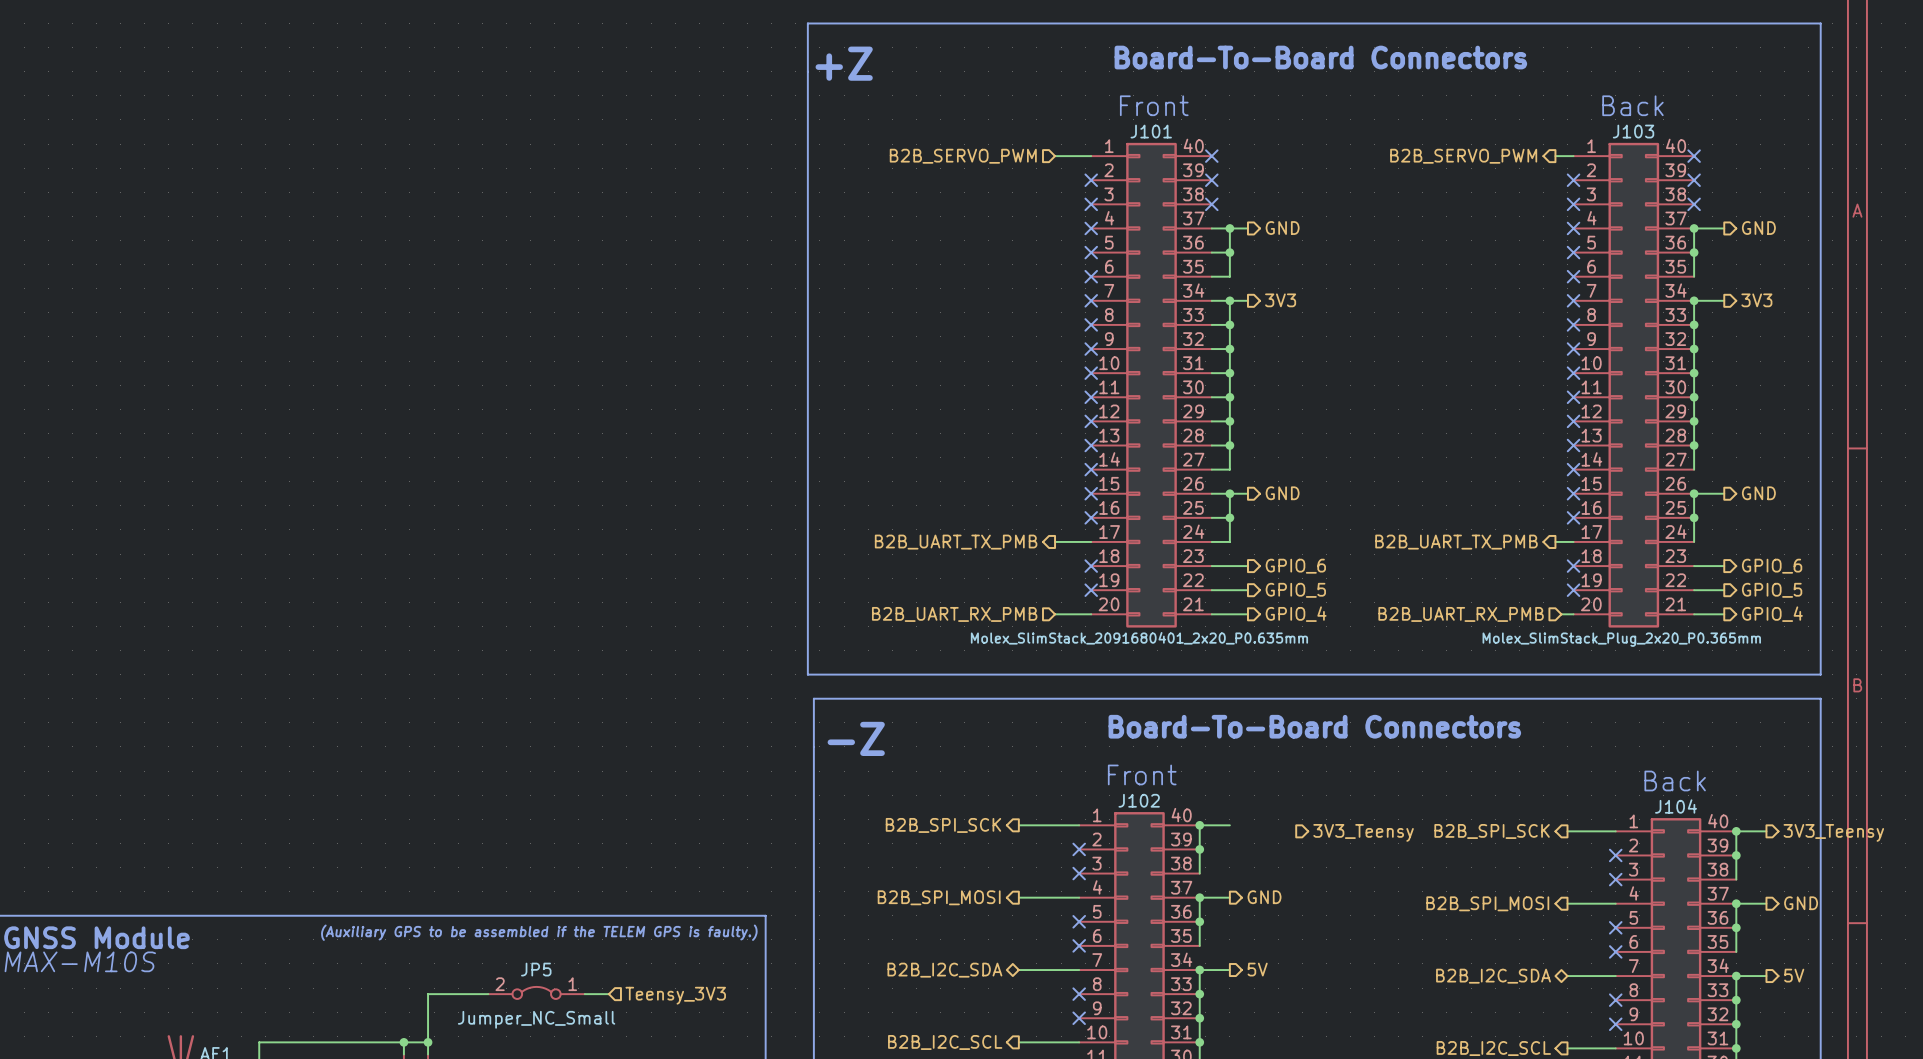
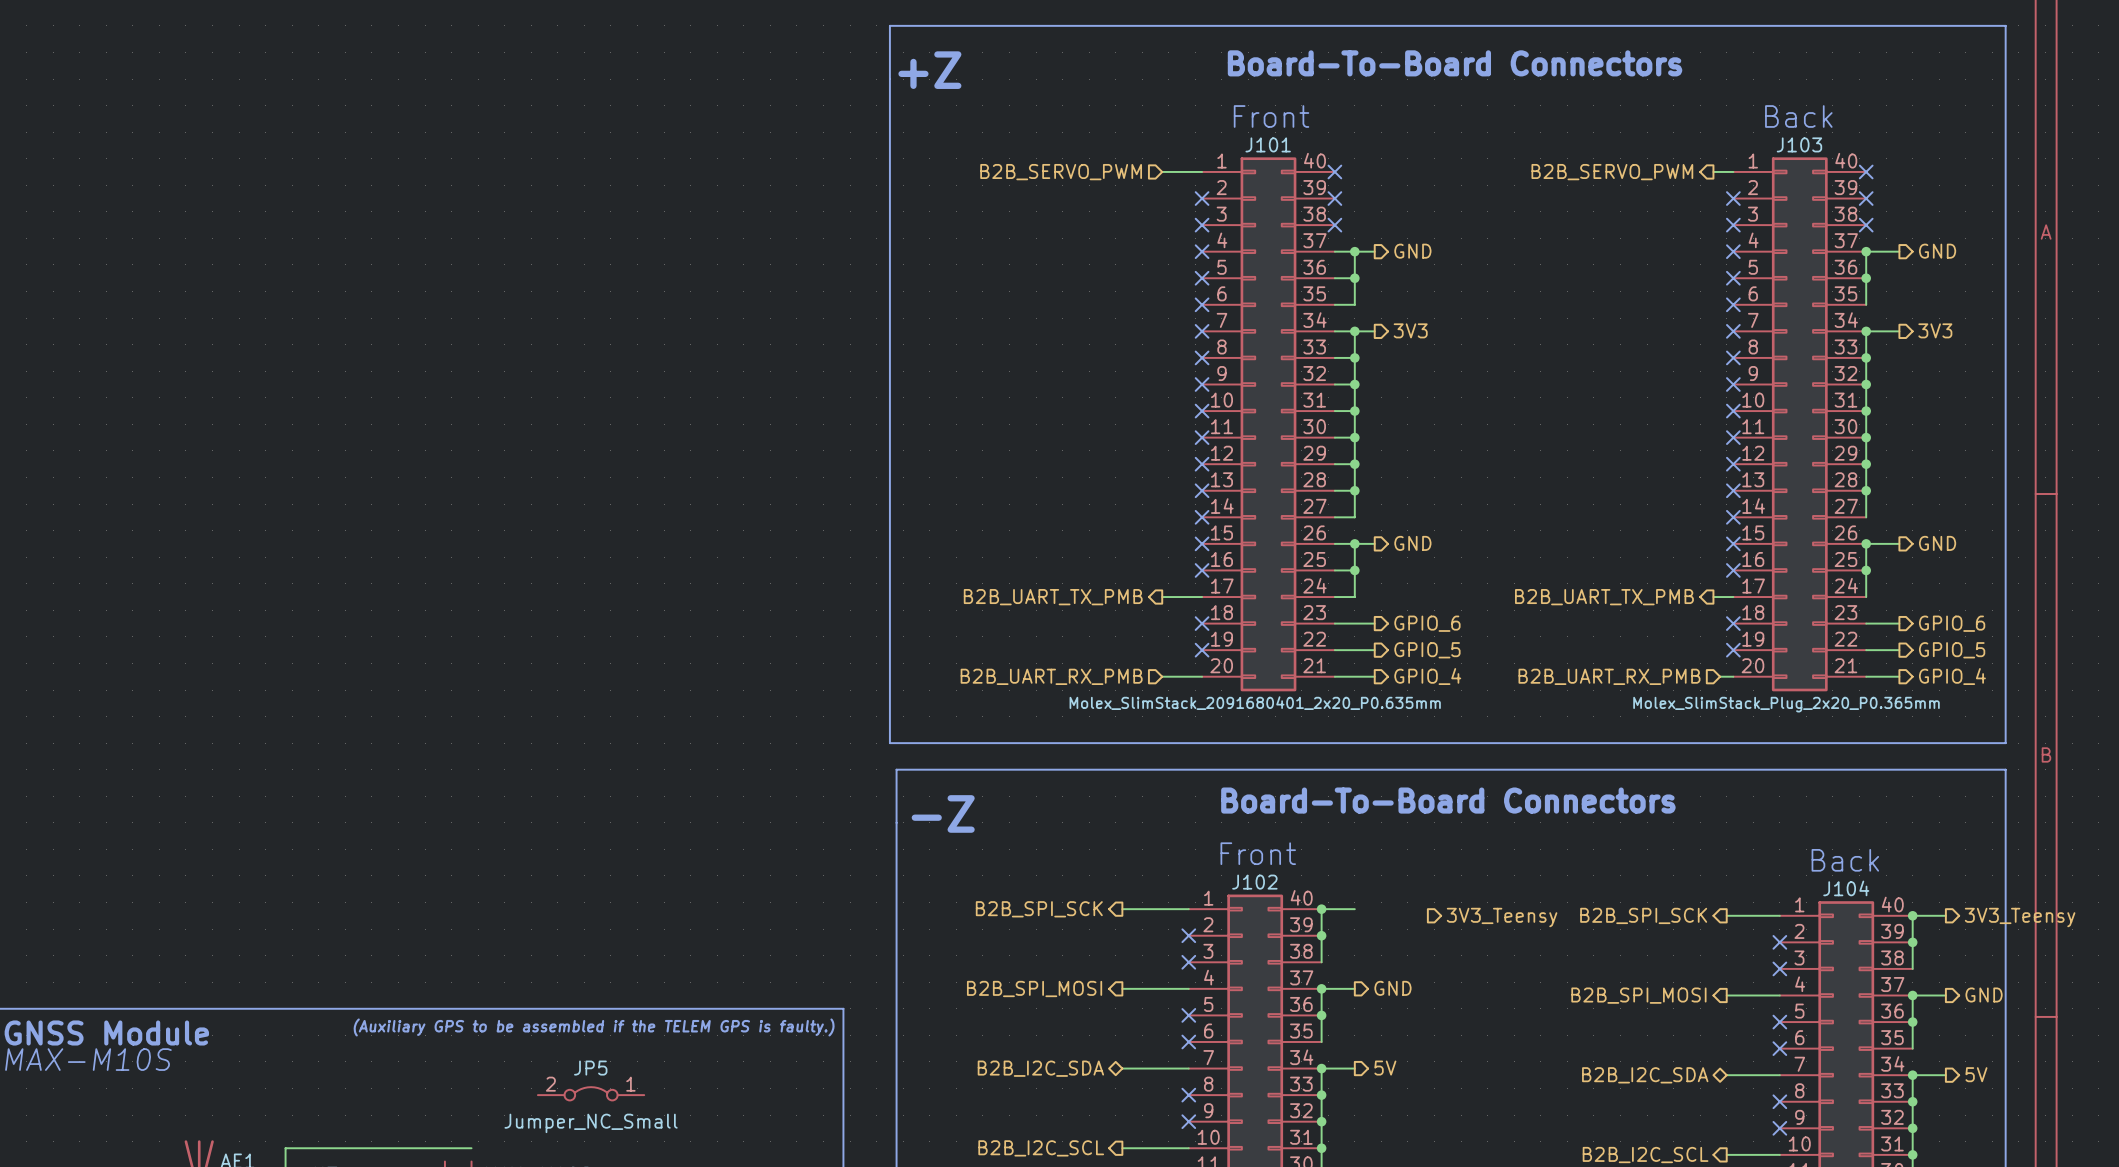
wire: (488, 994) (428, 994) (428, 1054) -> none
wire: (584, 994) (608, 994) -> none
hierarchical label: Teensy_3V3 (675, 995) -> none
wire: (403, 1042) (403, 1054) -> none
junction: (403, 1042) -> none
junction: (428, 1042) -> none

